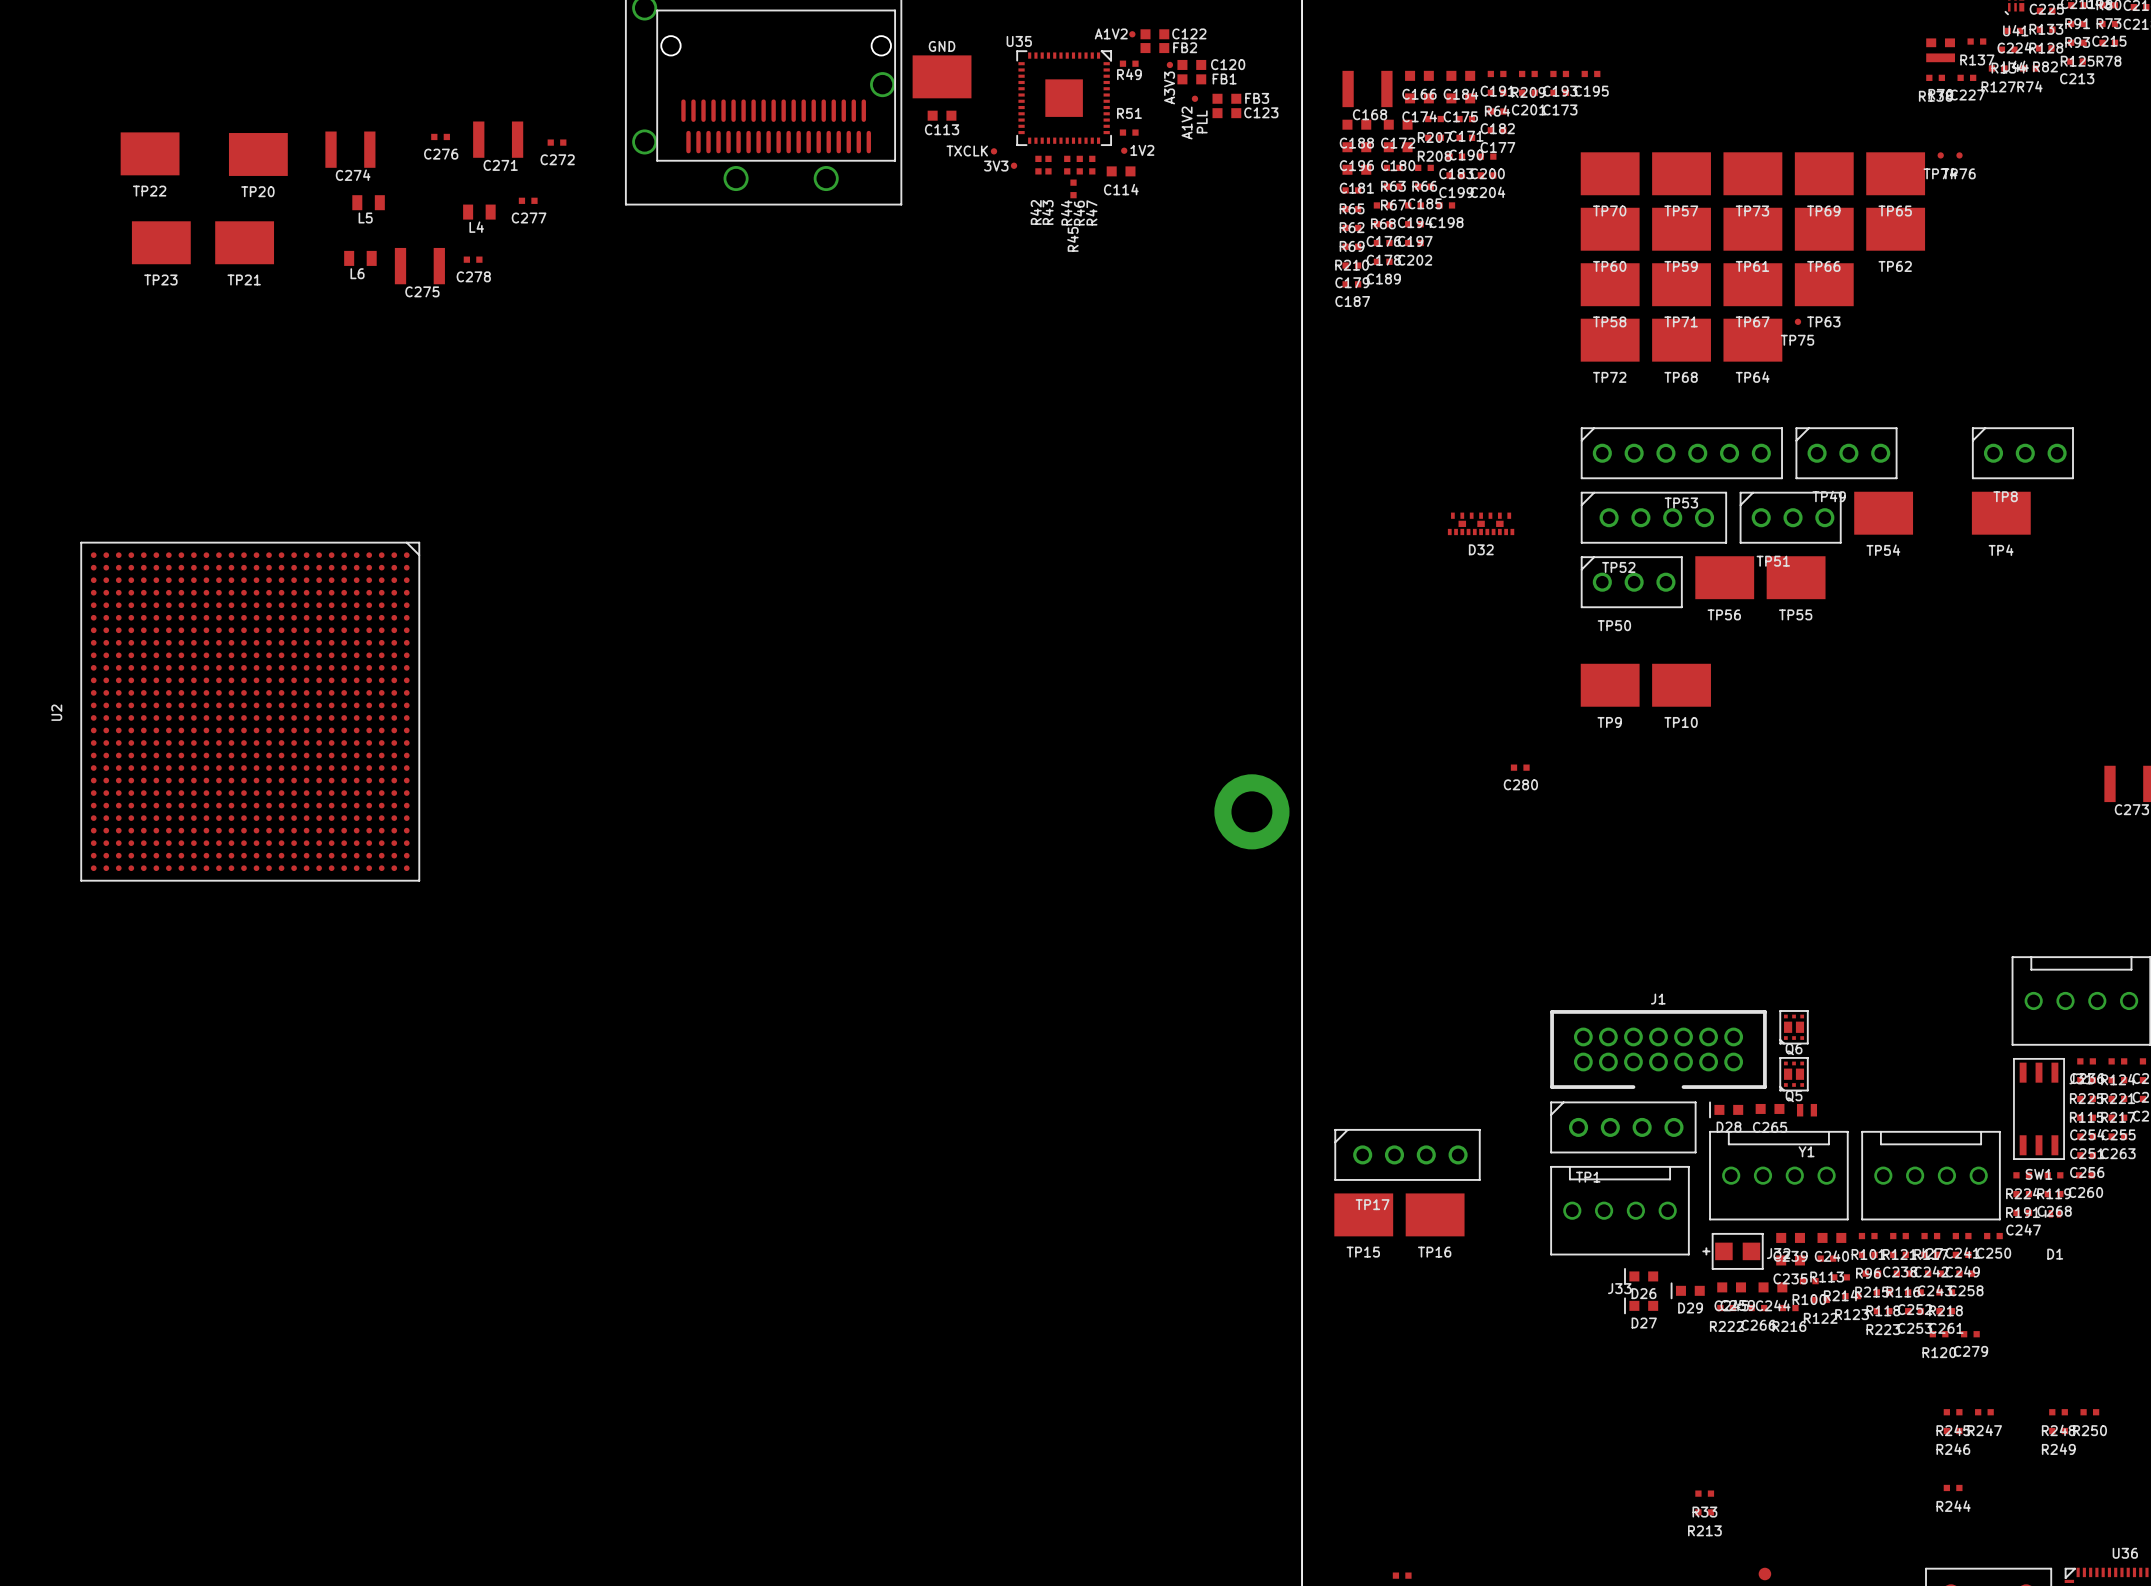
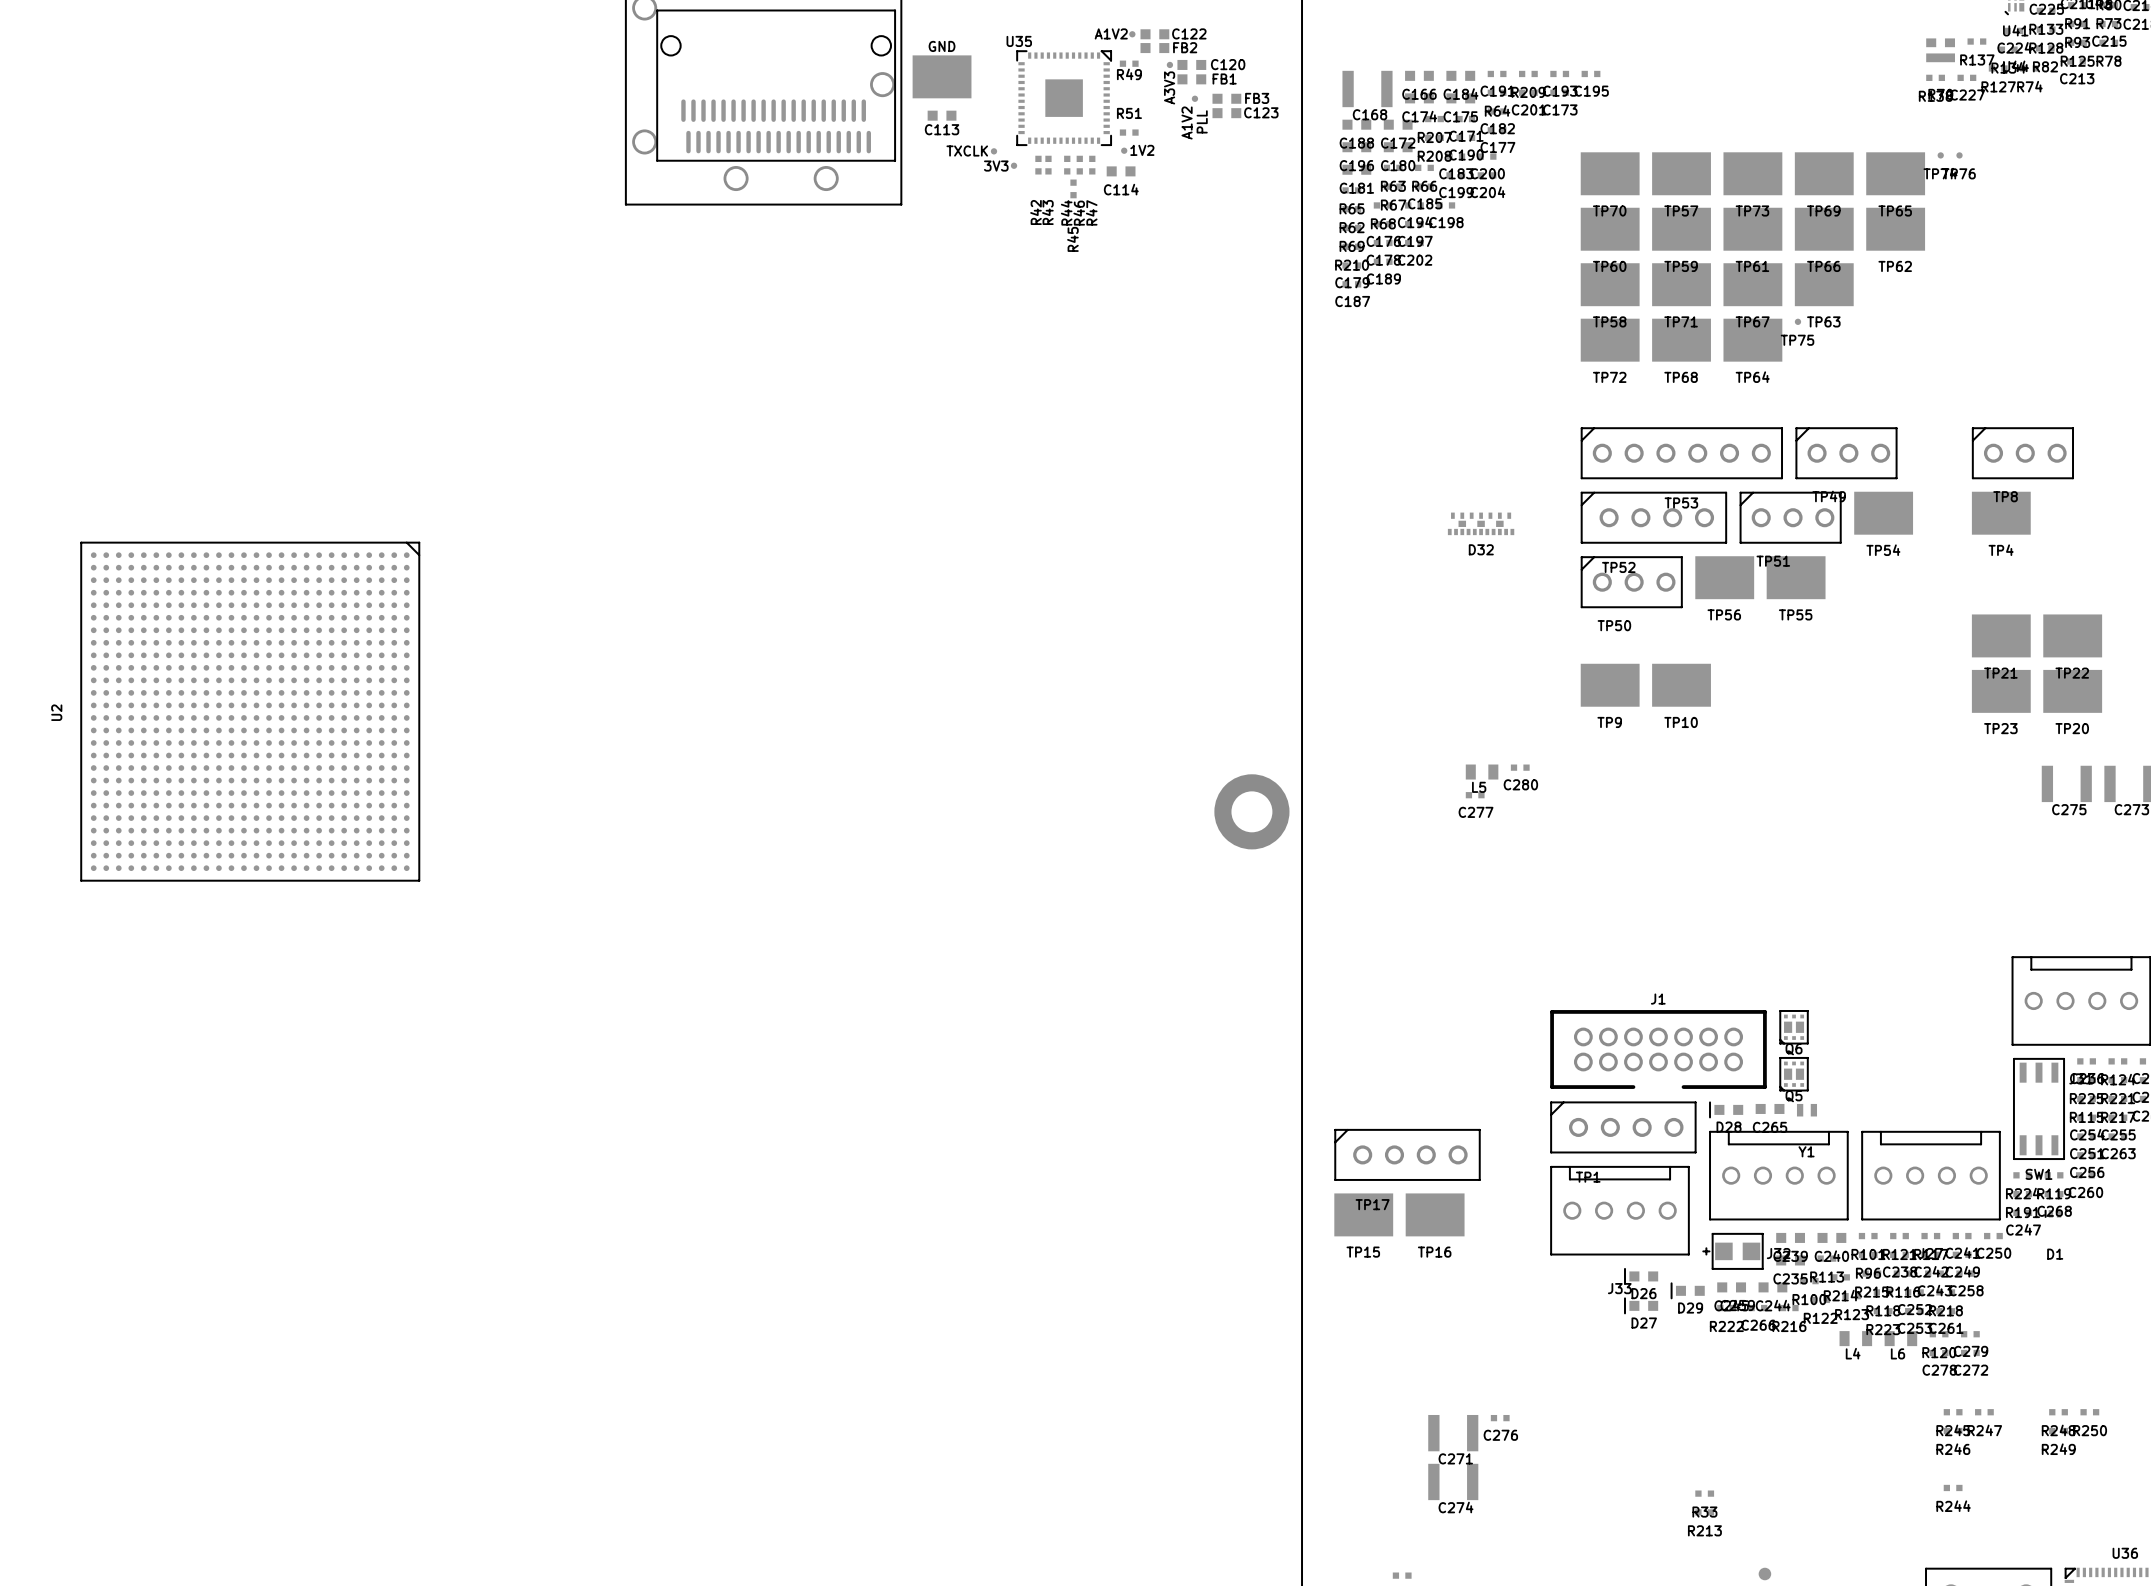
C276 position: (440, 136) -> (1500, 1418)
C271 position: (498, 139) -> (1453, 1433)
C272 position: (557, 142) -> (1970, 1353)
C274 position: (350, 149) -> (1453, 1481)
TP22 position: (150, 153) -> (2072, 635)
TP20 position: (258, 154) -> (2072, 691)
C277 position: (528, 200) -> (1475, 795)
L5 position: (368, 202) -> (1482, 772)
L4 position: (479, 212) -> (1855, 1338)
TP23 position: (161, 242) -> (2001, 691)
TP21 position: (244, 242) -> (2001, 635)
L6 position: (360, 258) -> (1900, 1338)
C278 position: (473, 259) -> (1939, 1353)
C275 position: (419, 266) -> (2066, 783)

